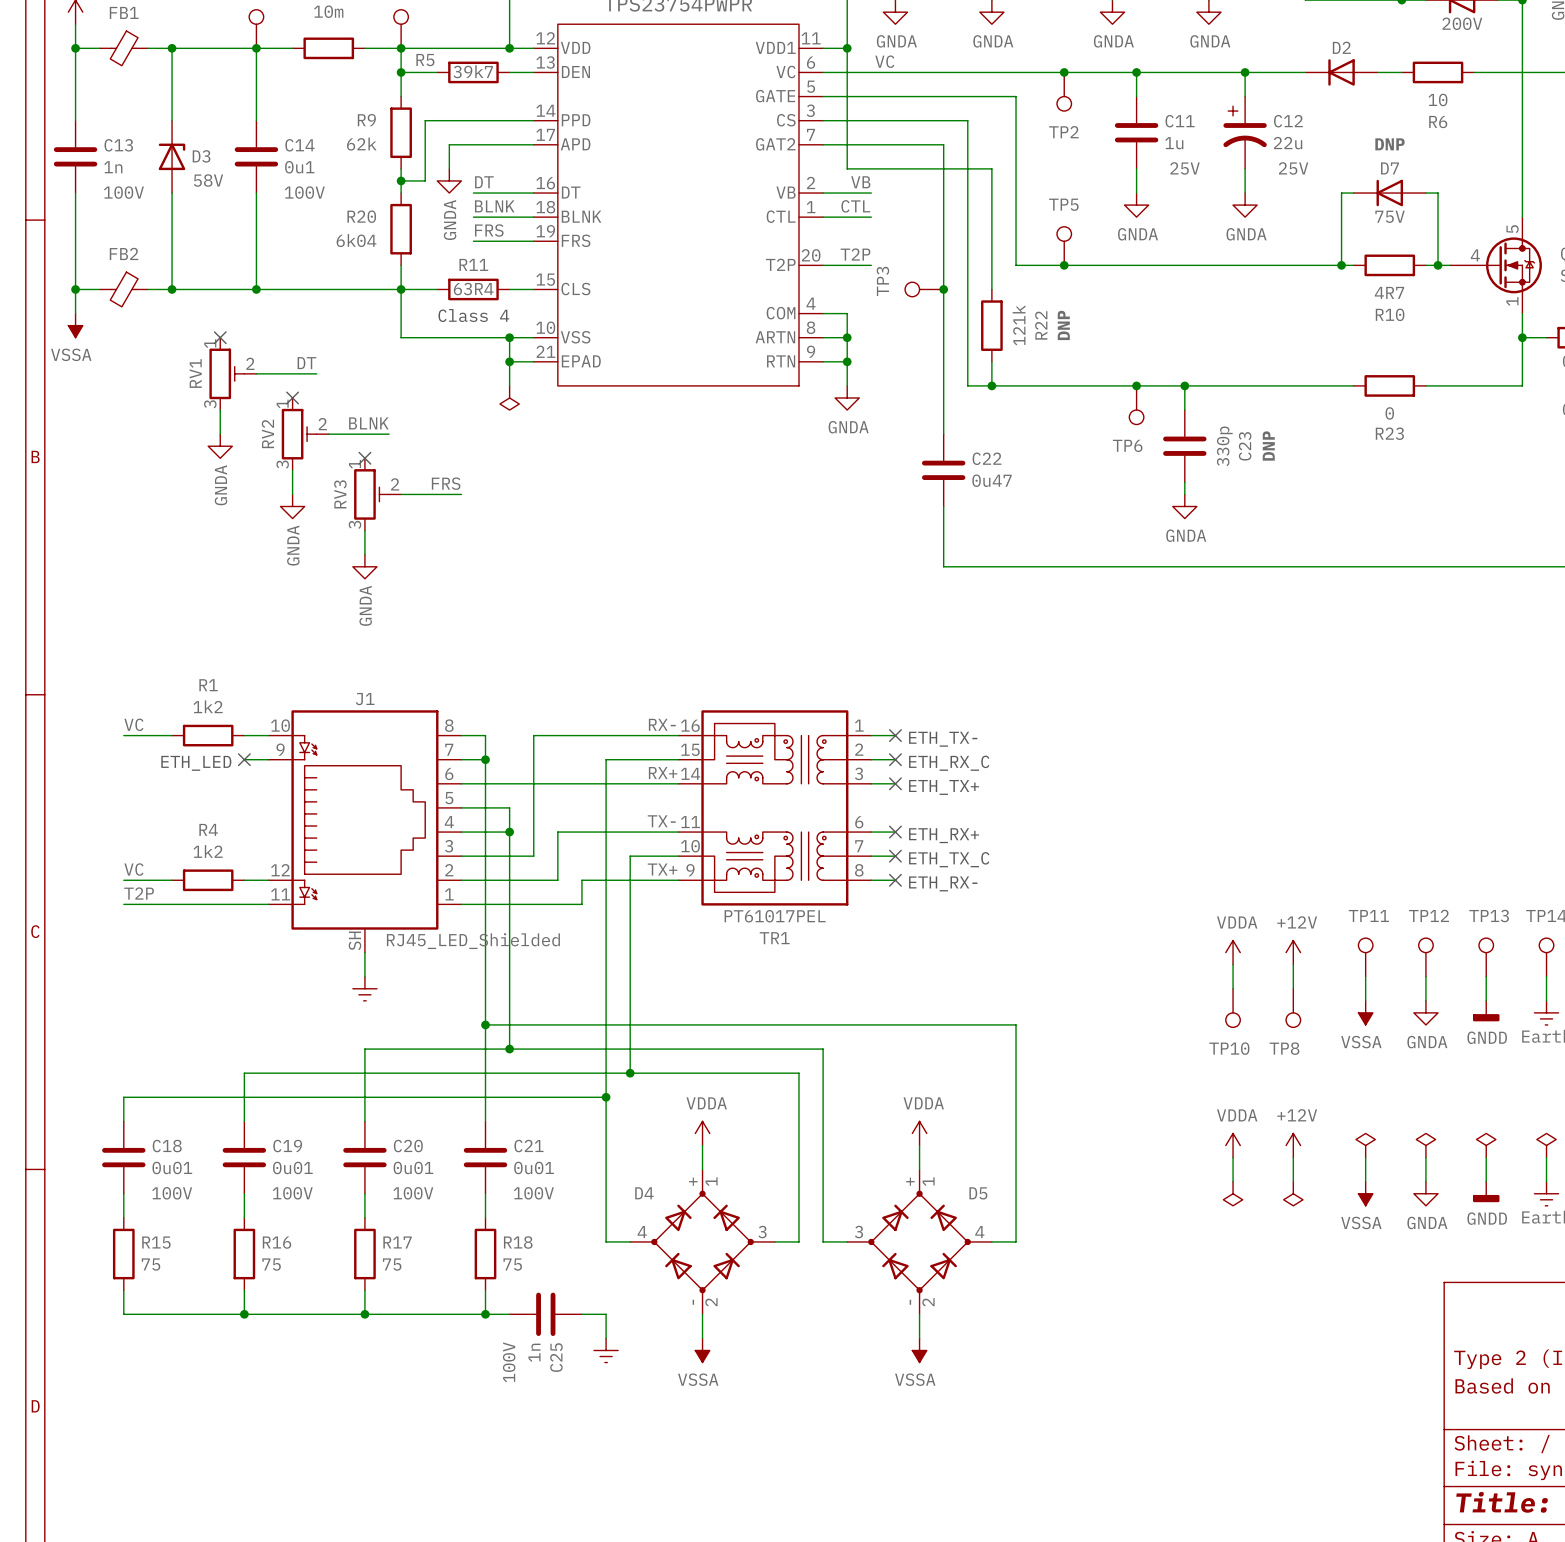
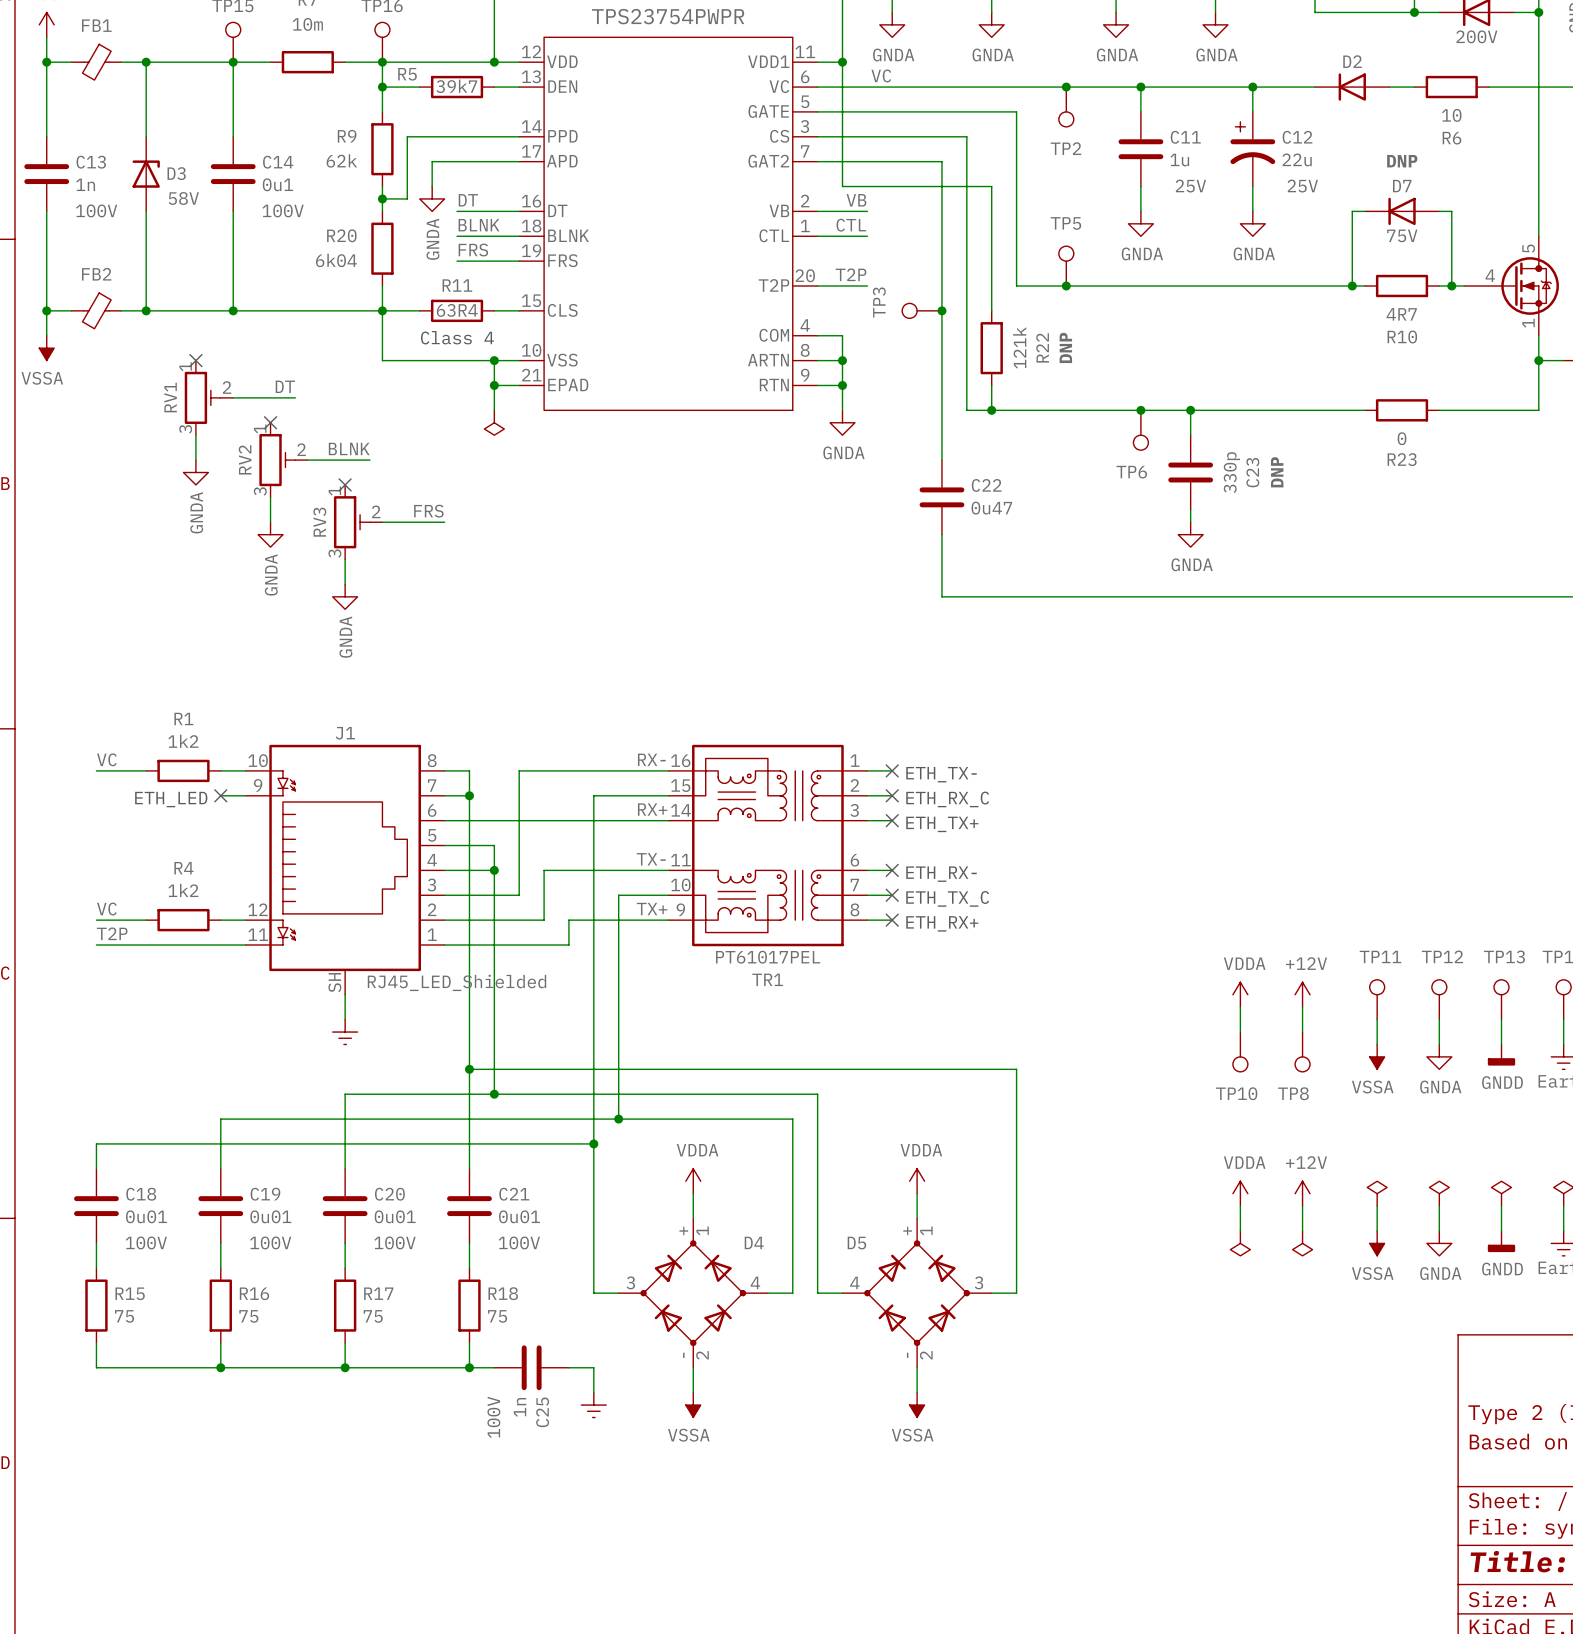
text: ETH_RX+ (944, 835) -> ETH_RX- (941, 874)
text: ETH_RX- (943, 883) -> ETH_RX+ (942, 923)
D4 flip: as is (702, 1241) -> left-right (693, 1293)
D5 flip: as is (919, 1241) -> left-right (917, 1293)

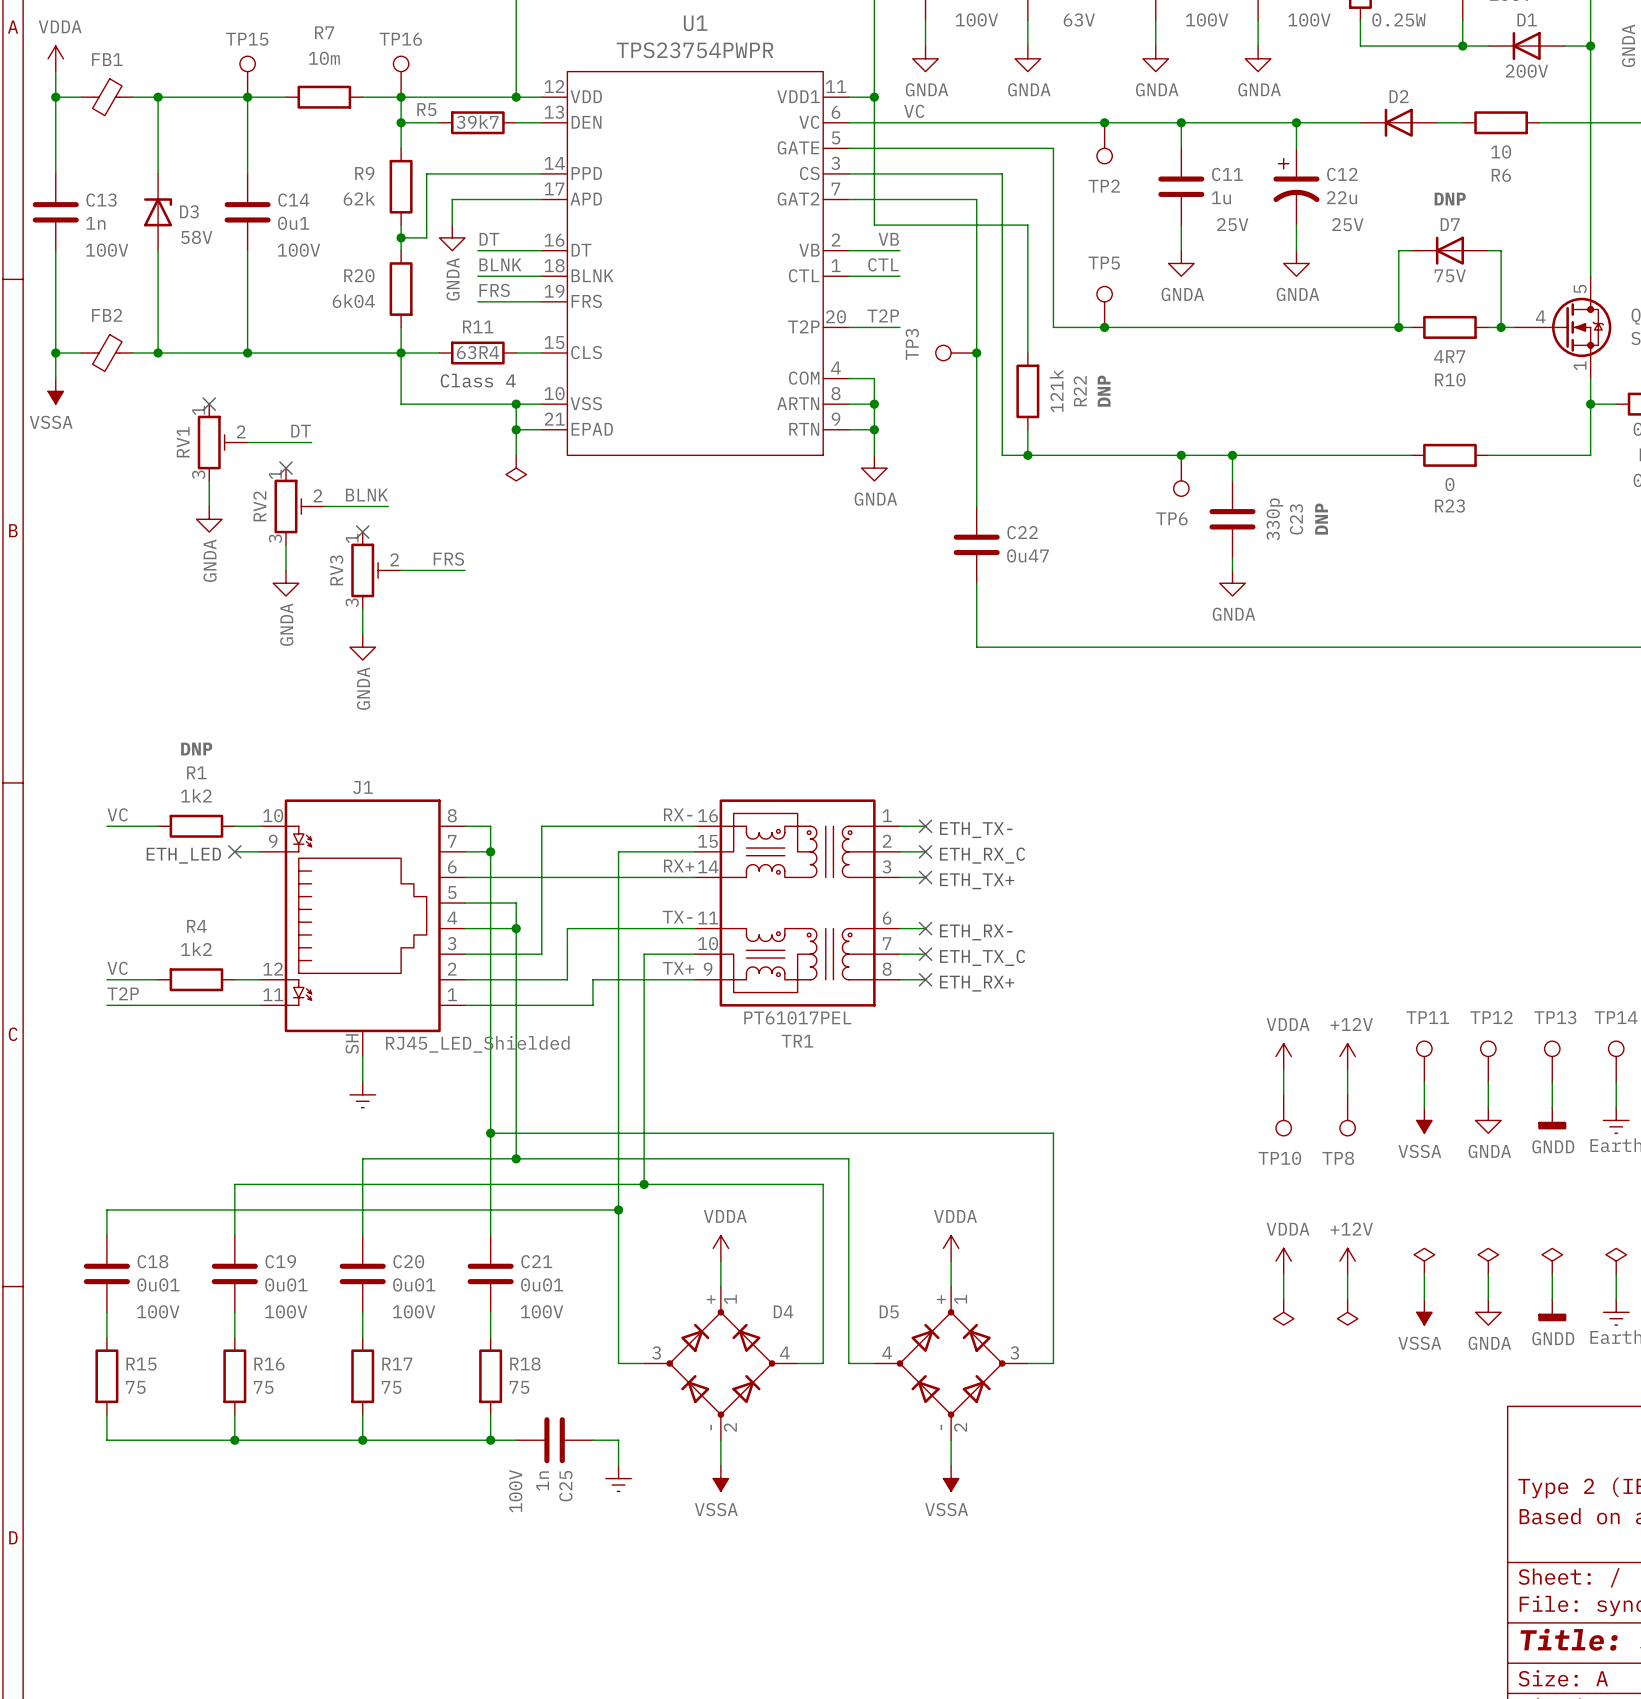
R1 text: none -> DNP (196, 749)

